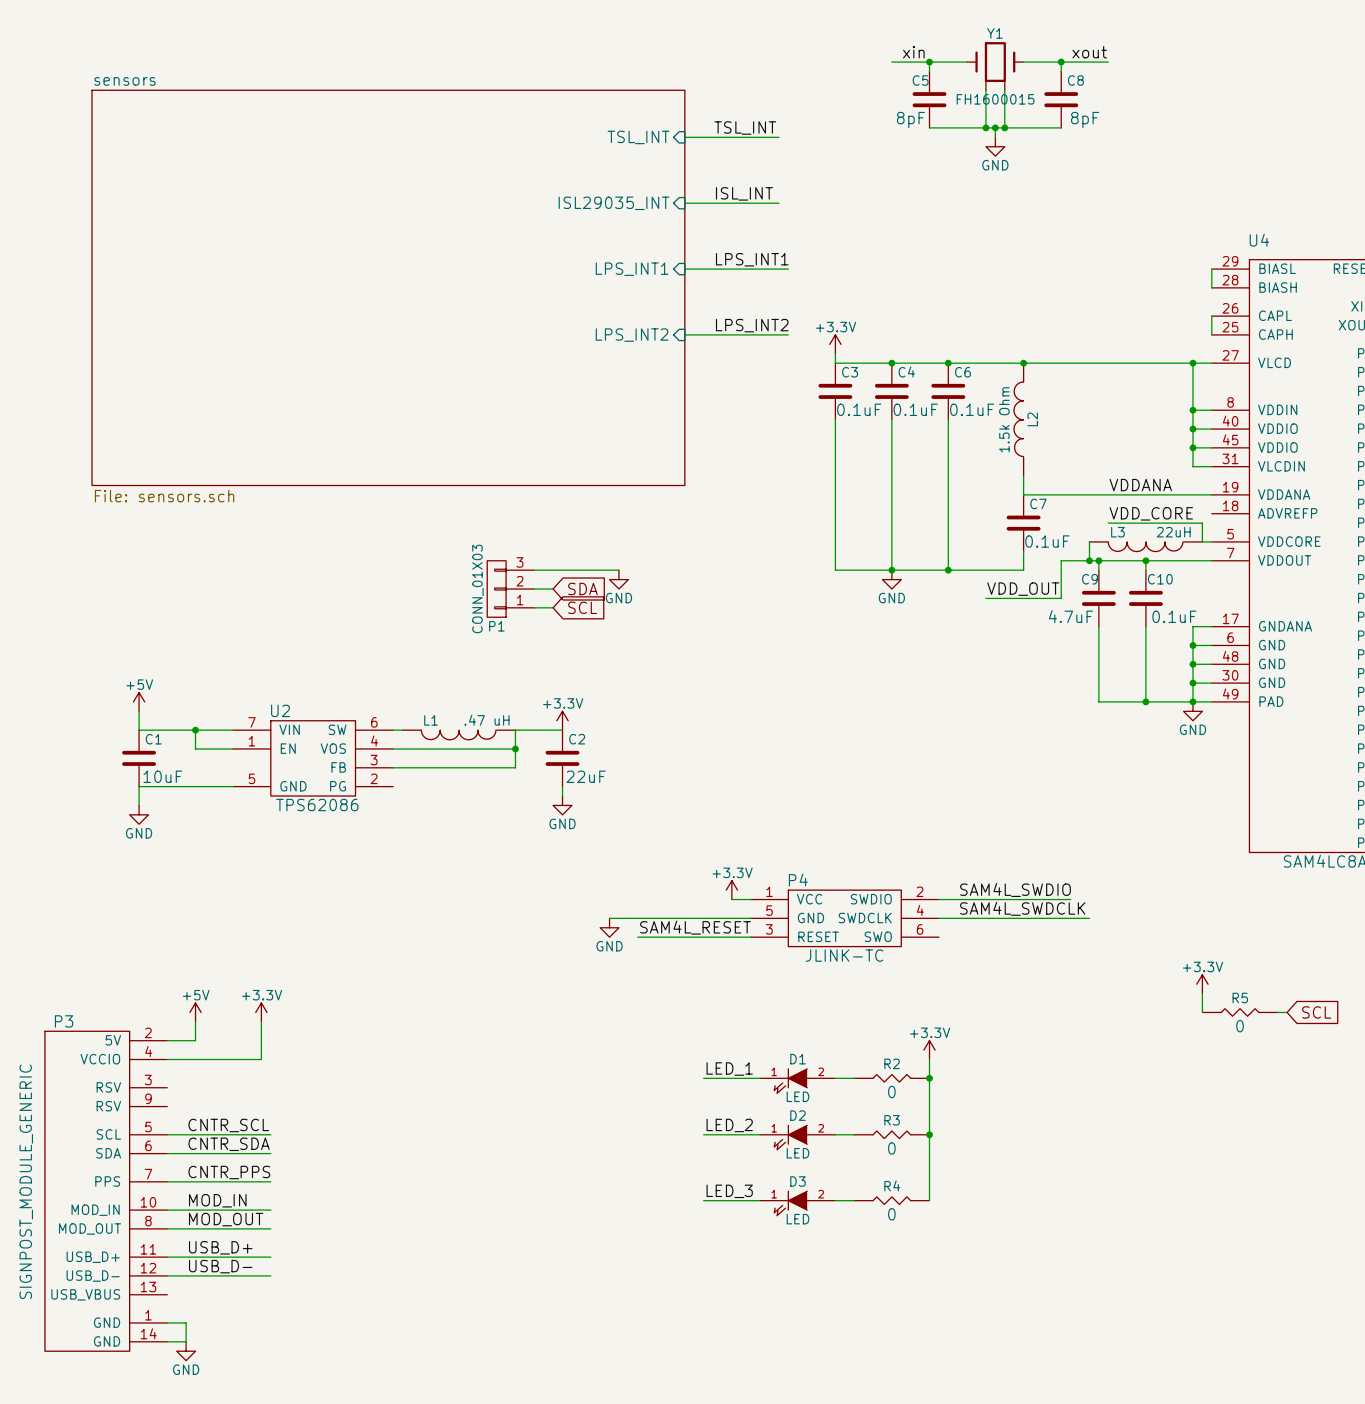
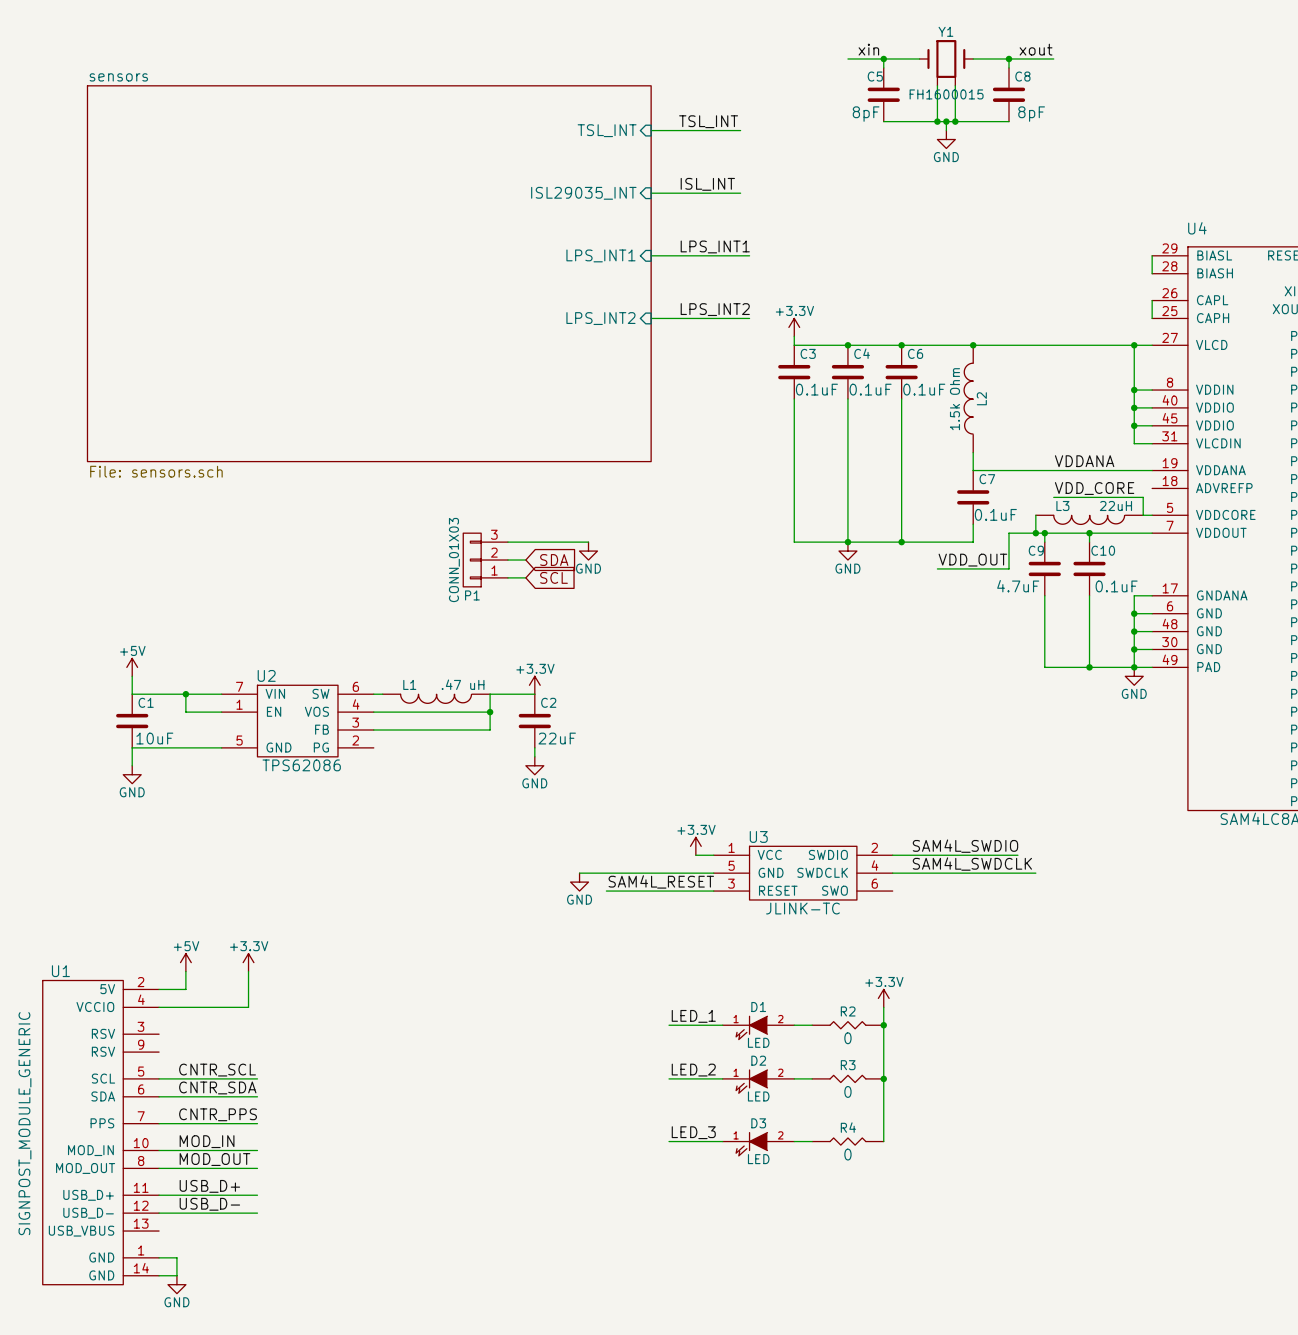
P4 name: P4 (798, 880) -> U3 (758, 836)
power symbol: +3.3V (1202, 984) -> none
wire: (1202, 993) (1202, 1012) -> none
R5: (1240, 1012) -> none
wire: (1277, 1012) (1287, 1012) -> none
global label: SCL (1316, 1012) -> none
P3 name: P3 (64, 1021) -> U1 (60, 971)

